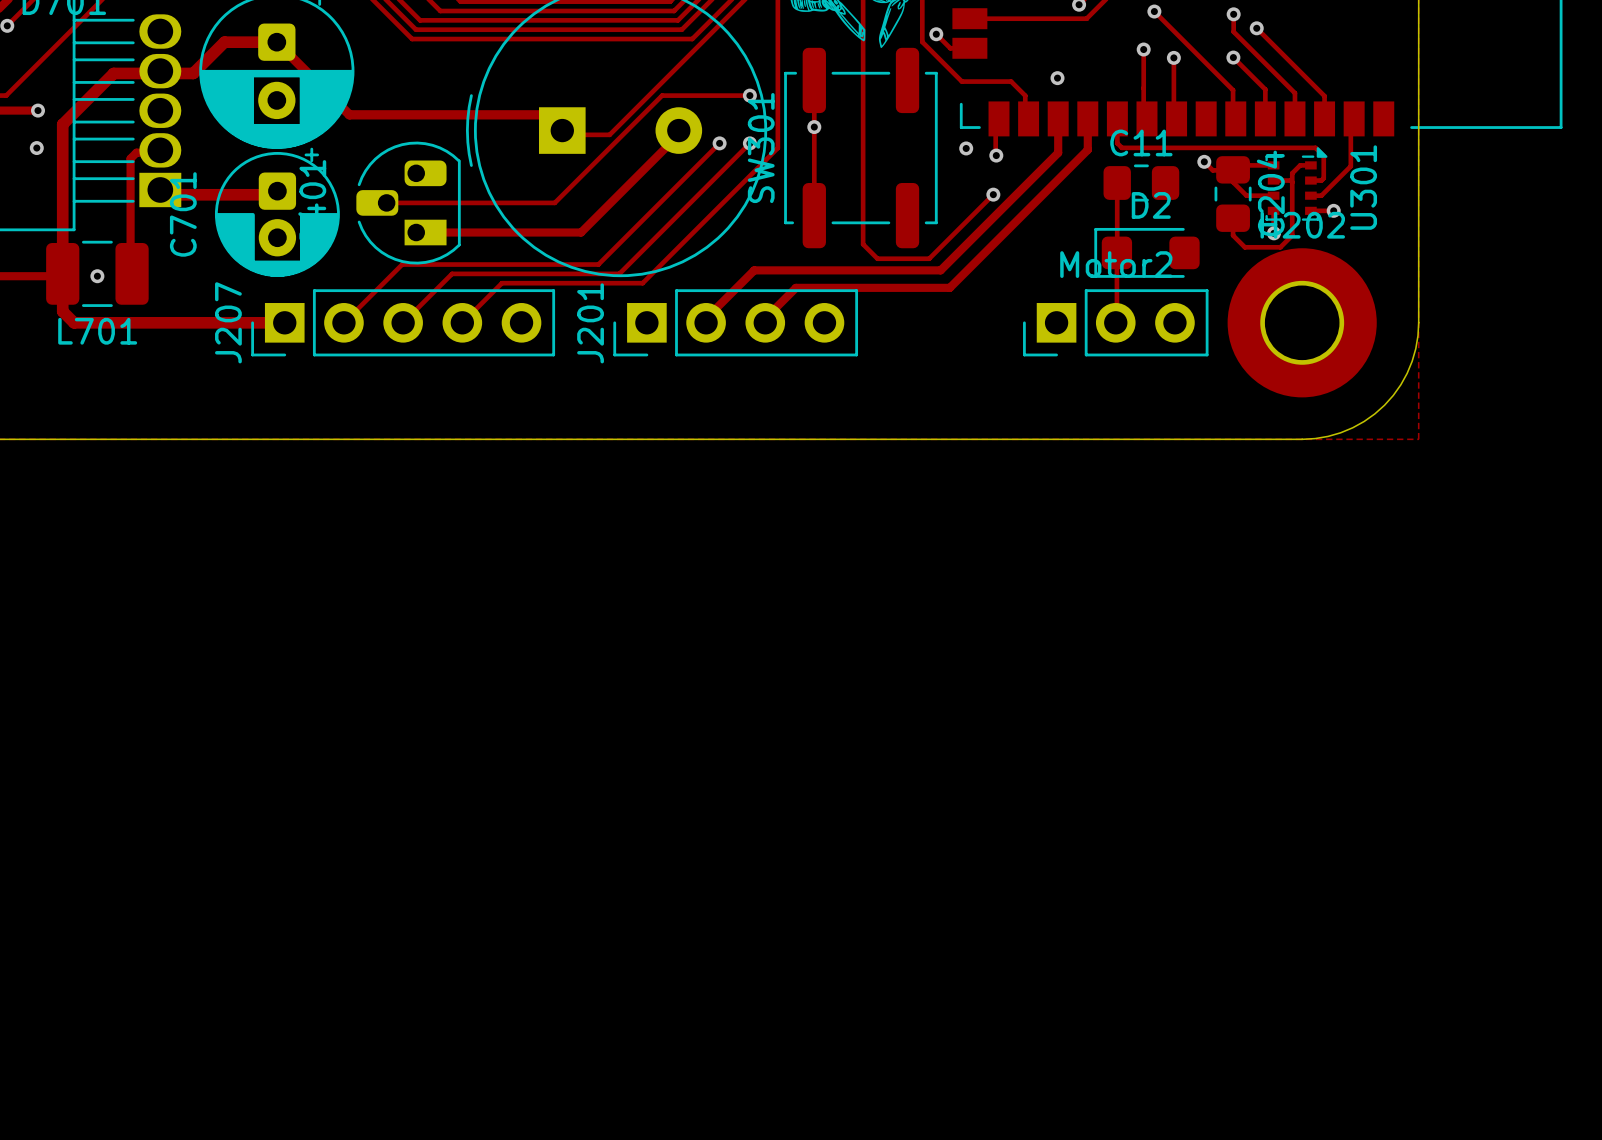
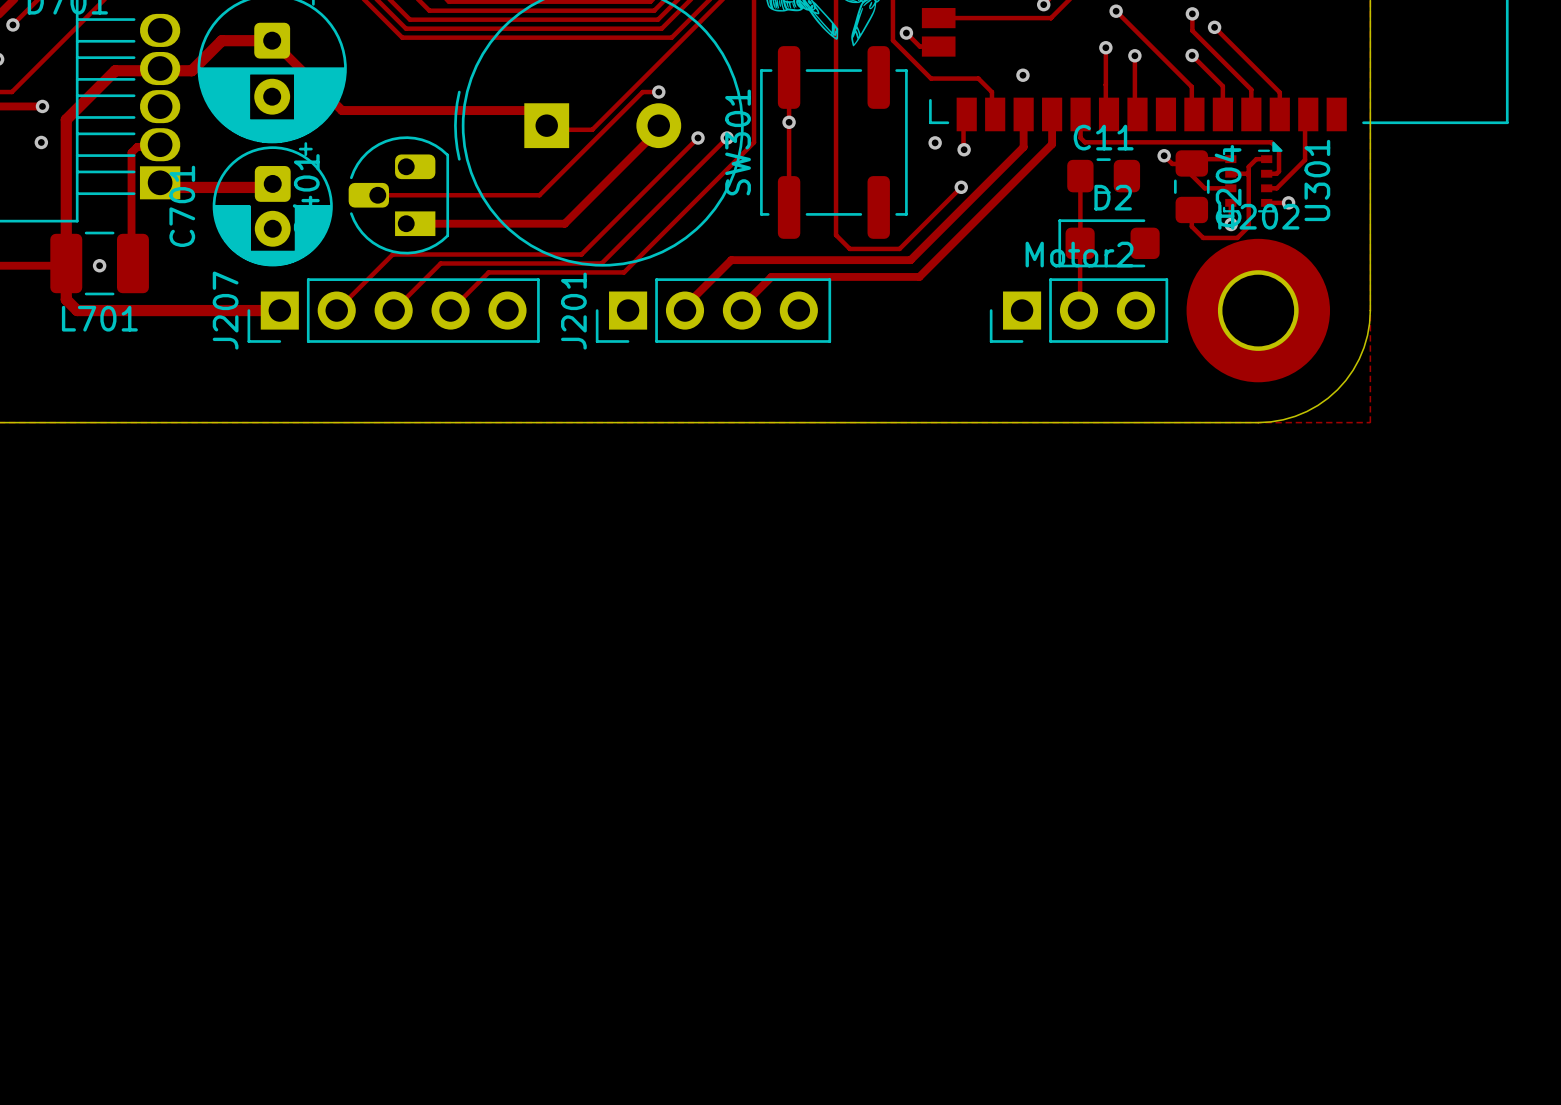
track: (678, 95) (749, 95) -> none
via position: (749, 95) -> (658, 92)

